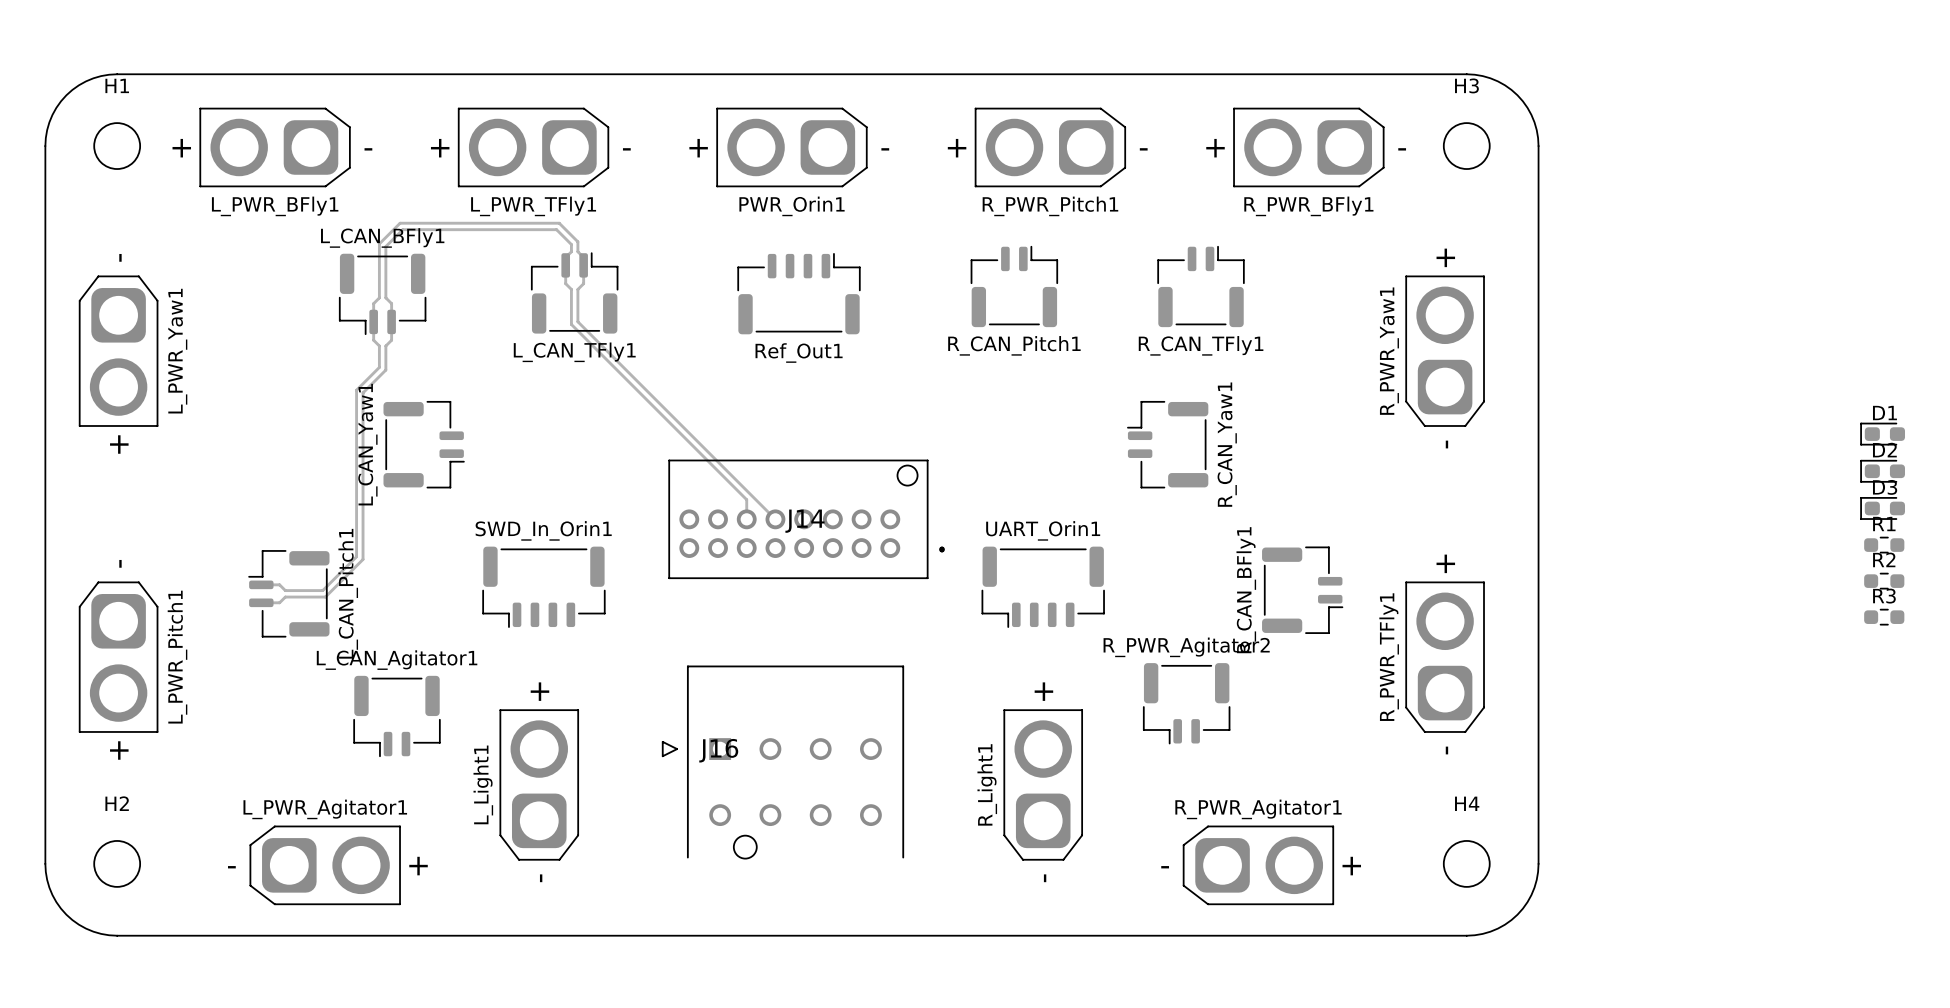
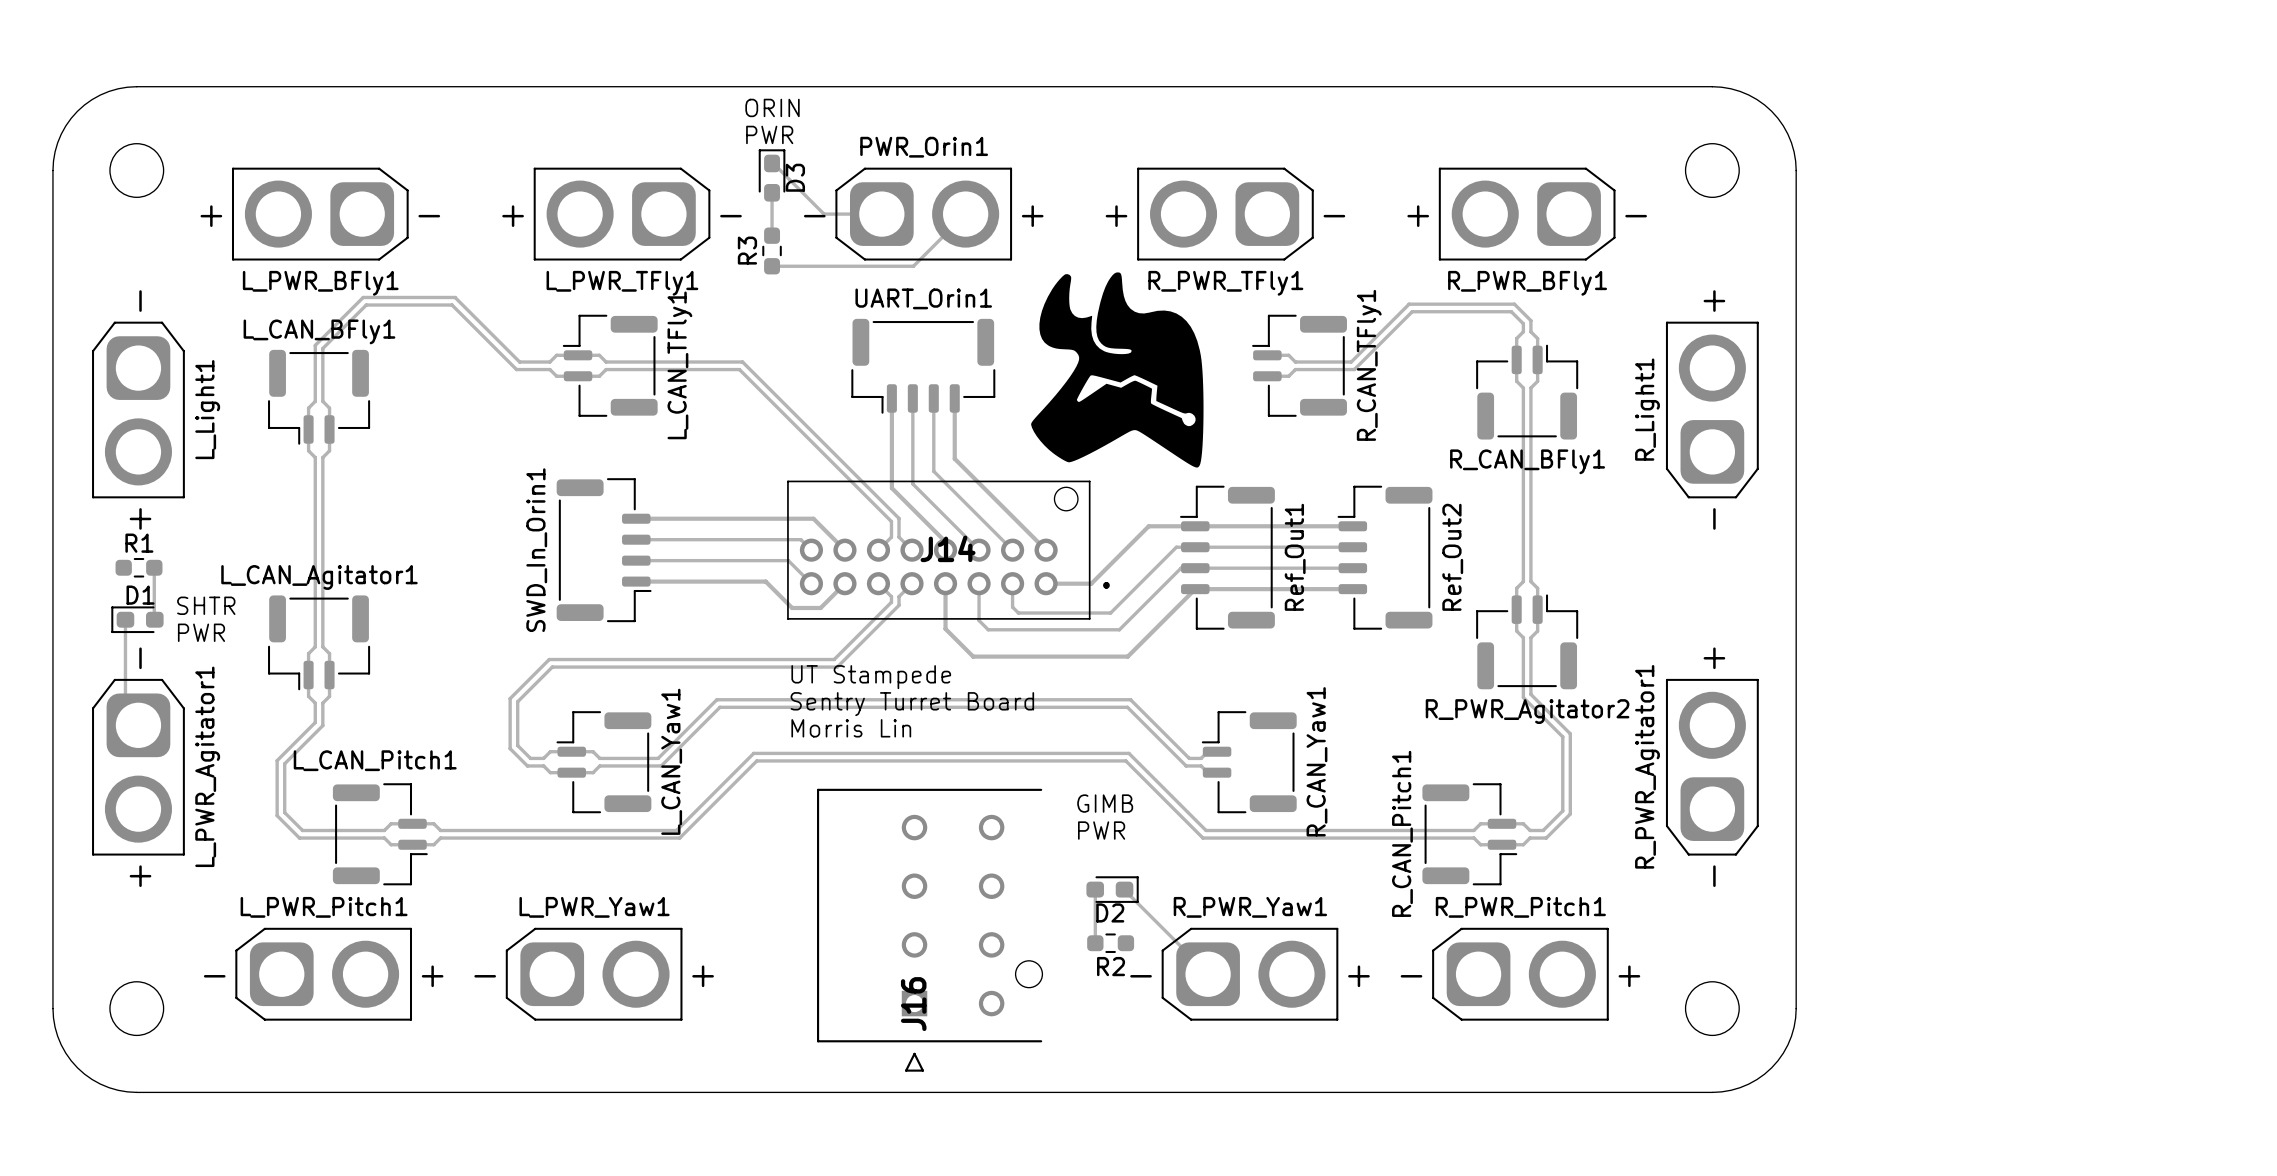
H1 name: H1 (117, 85) -> none
H3 name: H3 (1466, 85) -> none
text: none -> ORIN (772, 107)
text: none -> PWR (769, 134)
track: none -> (770, 160) (824, 214) (881, 214)
L_PWR_BFly1 position: (275, 147) -> (320, 214)
L_PWR_TFly1 position: (533, 147) -> (622, 214)
PWR_Orin1 rotation: 0° (791, 147) -> 180° (923, 214)
R_PWR_Pitch1 rotation: 0° (1050, 147) -> 180° (1520, 974)
R_PWR_Pitch1 position: (1050, 147) -> (1520, 974)
R_PWR_BFly1 position: (1308, 147) -> (1527, 214)
track: none -> (772, 192) (772, 235)
track: none -> (965, 214) (913, 266) (772, 266)
drawing: none -> [1031, 272, 1204, 468]
R_CAN_Pitch1 rotation: 0° (1014, 286) -> 90° clockwise (1469, 834)
R_CAN_Pitch1 position: (1014, 286) -> (1469, 834)
R_CAN_TFly1 rotation: 0° (1201, 286) -> 90° counterclockwise (1299, 365)
R_CAN_TFly1 position: (1201, 286) -> (1299, 365)
L_CAN_TFly1 rotation: 0° (574, 292) -> 90° counterclockwise (610, 365)
L_CAN_TFly1 position: (574, 292) -> (610, 365)
Ref_Out1 rotation: 0° (799, 293) -> 90° counterclockwise (1227, 557)
Ref_Out1 position: (799, 293) -> (1227, 557)
L_CAN_BFly1 position: (382, 294) -> (319, 397)
track: none -> (1267, 355) (1288, 355) (1295, 362) (1351, 362) (1409, 304) (1514, 304) (1530, 320) (1530, 331) (1537, 338) (1537, 381) (1530, 387) (1530, 581) (1537, 588) (1537, 631) (1530, 637) (1530, 694) (1570, 733) (1570, 814) (1546, 838) (1530, 838) (1523, 844) (1480, 844) (1473, 838) (1202, 838) (1125, 760) (756, 760) (679, 838) (440, 838) (433, 844) (391, 844) (384, 838) (299, 838) (277, 815) (277, 760) (315, 722) (315, 703) (308, 696) (308, 653) (315, 646) (315, 457) (308, 450) (308, 408) (315, 401) (315, 345) (363, 297) (455, 297) (519, 362) (549, 362) (556, 355) (599, 355) (606, 362) (742, 362) (899, 518) (899, 537) (912, 550)
track: none -> (1267, 376) (1288, 376) (1295, 369) (1354, 369) (1412, 311) (1511, 311) (1523, 323) (1523, 331) (1516, 338) (1516, 381) (1523, 387) (1523, 581) (1516, 588) (1516, 631) (1523, 637) (1523, 697) (1562, 736) (1562, 810) (1543, 830) (1530, 830) (1523, 823) (1480, 823) (1473, 830) (1206, 830) (1128, 753) (753, 753) (676, 830) (440, 830) (433, 823) (391, 823) (384, 830) (302, 830) (284, 812) (284, 763) (322, 725) (322, 703) (329, 696) (329, 653) (322, 646) (322, 457) (329, 450) (329, 408) (322, 401) (322, 348) (366, 305) (452, 305) (516, 369) (549, 369) (556, 376) (599, 376) (606, 369) (739, 369) (891, 521) (891, 537) (878, 550)
track: none -> (891, 398) (891, 488) (945, 541) (945, 550)
track: none -> (912, 398) (912, 483) (979, 550)
track: none -> (933, 398) (933, 471) (1012, 550)
track: none -> (954, 398) (954, 458) (1046, 550)
L_PWR_Yaw1 name: L_PWR_Yaw1 (177, 351) -> L_Light1 (207, 409)
R_PWR_Yaw1 rotation: 0° (1445, 351) -> 90° clockwise (1250, 974)
R_PWR_Yaw1 position: (1445, 351) -> (1250, 974)
D1 position: (1882, 434) -> (137, 619)
L_CAN_Yaw1 rotation: 0° (424, 444) -> 180° (603, 762)
L_CAN_Yaw1 position: (424, 444) -> (603, 762)
track: none -> (636, 518) (813, 518) (844, 550)
R_CAN_Yaw1 position: (1167, 444) -> (1249, 762)
track: none -> (1352, 526) (1148, 526) (1091, 583) (1046, 583)
track: none -> (636, 539) (800, 539) (811, 550)
track: none -> (1352, 547) (1176, 547) (1110, 613) (1018, 613) (1012, 607) (1012, 583)
D2 rotation: 0° (1882, 471) -> 180° (1112, 889)
D2 position: (1882, 471) -> (1112, 889)
Ref_Out2: none -> (1385, 557)
track: none -> (636, 560) (788, 560) (811, 583)
track: none -> (154, 567) (154, 619)
track: none -> (1352, 568) (1181, 568) (1119, 629) (988, 629) (979, 620) (979, 583)
track: none -> (636, 581) (765, 581) (792, 607) (820, 607) (844, 583)
track: none -> (878, 583) (891, 596) (891, 602) (834, 659) (549, 659) (510, 698) (510, 748) (527, 765) (543, 765) (550, 772) (593, 772) (599, 765) (661, 765) (719, 707) (1127, 707) (1186, 765) (1201, 765) (1207, 772) (1217, 772)
track: none -> (912, 583) (899, 596) (899, 605) (837, 667) (552, 667) (517, 701) (517, 745) (530, 758) (543, 758) (550, 751) (593, 751) (599, 758) (658, 758) (716, 699) (1130, 699) (1189, 758) (1201, 758) (1207, 751) (1217, 751)
track: none -> (945, 583) (945, 628) (973, 656) (1127, 656) (1195, 589) (1352, 589)
D3 rotation: 0° (1882, 508) -> 90° clockwise (772, 175)
D3 position: (1882, 508) -> (772, 175)
text: none -> SHTR (206, 605)
track: (746, 519) (746, 499) (571, 324) (571, 289) (565, 283) (565, 257) (571, 251) (571, 244) (556, 229) (402, 229) (385, 246) (385, 297) (391, 303) (391, 340) (385, 345) (385, 370) (363, 392) (363, 559) (325, 597) (285, 597) (279, 602) (261, 602) -> none
track: (775, 519) (577, 321) (577, 289) (583, 283) (583, 257) (577, 251) (577, 241) (559, 223) (400, 223) (379, 243) (379, 297) (373, 303) (373, 340) (379, 345) (379, 367) (356, 390) (356, 556) (322, 590) (285, 590) (279, 584) (261, 584) -> none
J14 position: (806, 519) -> (948, 550)
track: none -> (125, 619) (125, 712) (138, 725)
text: none -> PWR (201, 632)
R1 position: (1884, 545) -> (139, 567)
R2 name position: R2 (1884, 559) -> R2 (1111, 966)
text: none -> UT Stampede (871, 677)
R2 position: (1884, 581) -> (1110, 943)
SWD_In_Orin1 rotation: 0° (543, 587) -> 90° counterclockwise (604, 550)
SWD_In_Orin1 position: (543, 587) -> (604, 550)
UART_Orin1 position: (1043, 587) -> (923, 366)
R_CAN_BFly1 rotation: 0° (1302, 590) -> 90° counterclockwise (1527, 392)
R_CAN_BFly1 position: (1302, 590) -> (1527, 392)
L_CAN_Pitch1 rotation: 0° (288, 593) -> 180° (380, 834)
L_CAN_Pitch1 position: (288, 593) -> (380, 834)
L_CAN_Pitch1 name position: L_CAN_Pitch1 (348, 593) -> L_CAN_Pitch1 (375, 760)
R3 name position: R3 (1884, 596) -> R3 (747, 250)
text: none -> Sentry Turret Board (912, 704)
R3 rotation: 0° (1884, 617) -> 90° clockwise (772, 250)
R3 position: (1884, 617) -> (772, 250)
text: none -> Morris Lin (851, 728)
L_PWR_Pitch1 name: L_PWR_Pitch1 (177, 657) -> L_PWR_Agitator1 (207, 766)
R_PWR_TFly1 rotation: 0° (1445, 657) -> 90° counterclockwise (1225, 214)
R_PWR_TFly1 position: (1445, 657) -> (1225, 214)
text: none -> GIMB (1105, 803)
R_PWR_Agitator2 rotation: 0° (1186, 703) -> 180° (1527, 641)
R_PWR_Agitator2 position: (1186, 703) -> (1527, 641)
text: none -> PWR (1101, 830)
L_CAN_Agitator1 position: (396, 716) -> (319, 642)
track: none -> (1122, 887) (1208, 974)
J16 rotation: 0° (782, 762) -> 90° counterclockwise (929, 930)
track: none -> (1097, 894) (1095, 896) (1095, 943)
L_Light1: (539, 784) -> none
R_Light1 position: (1043, 784) -> (1712, 410)
H2 name: H2 (117, 803) -> none
H4 name: H4 (1467, 803) -> none
L_PWR_Pitch1: none -> (323, 974)
L_PWR_Yaw1: none -> (594, 974)
L_PWR_Agitator1: (325, 865) -> none
R_PWR_Agitator1 rotation: 0° (1258, 865) -> 90° counterclockwise (1712, 767)
R_PWR_Agitator1 position: (1258, 865) -> (1712, 767)

